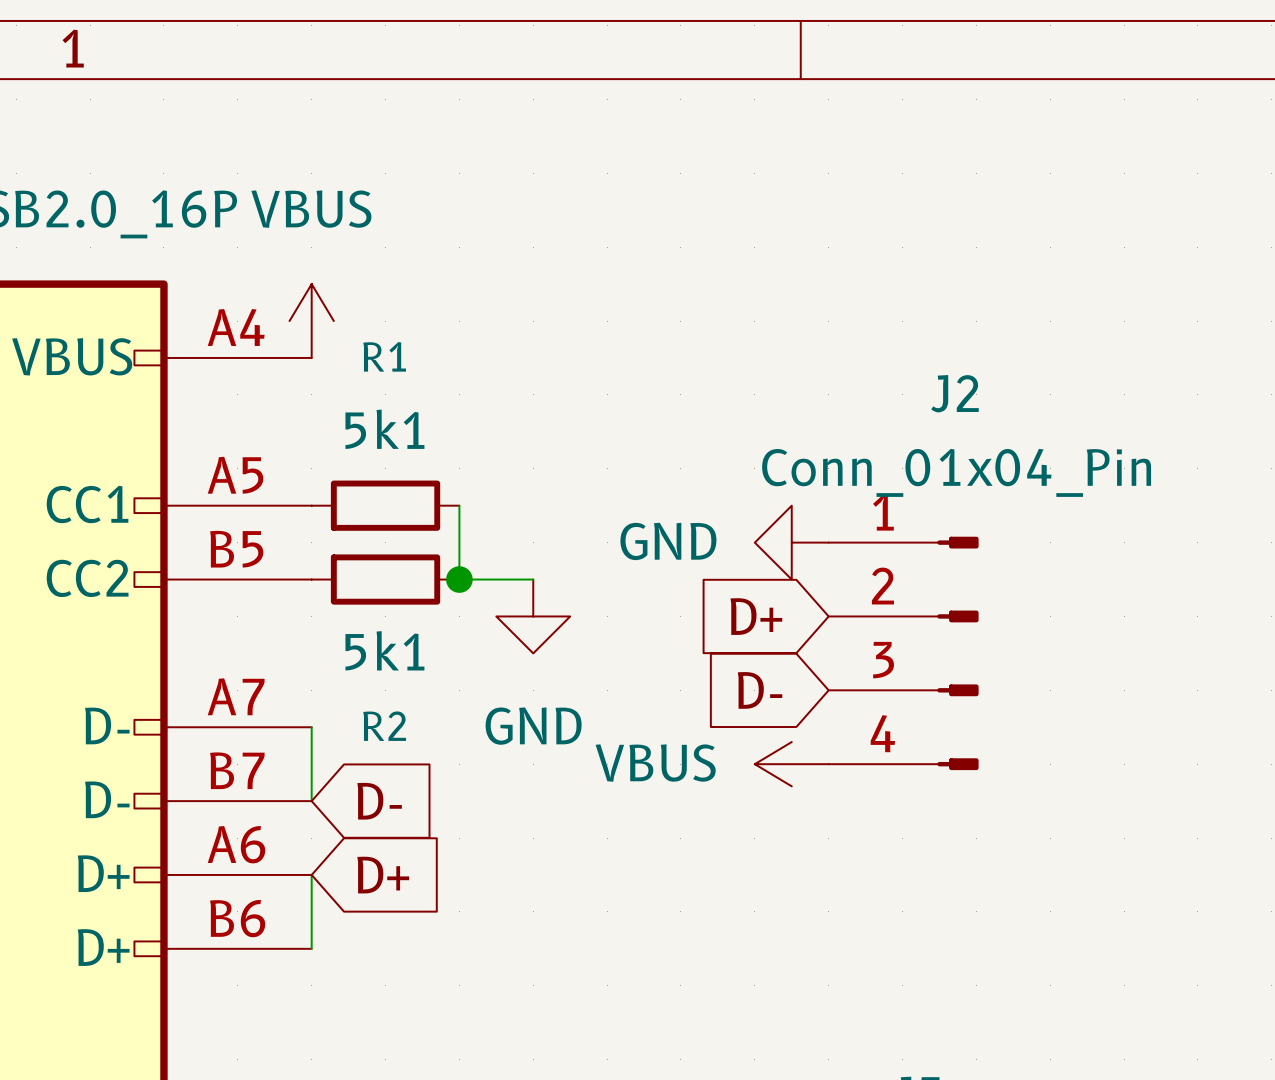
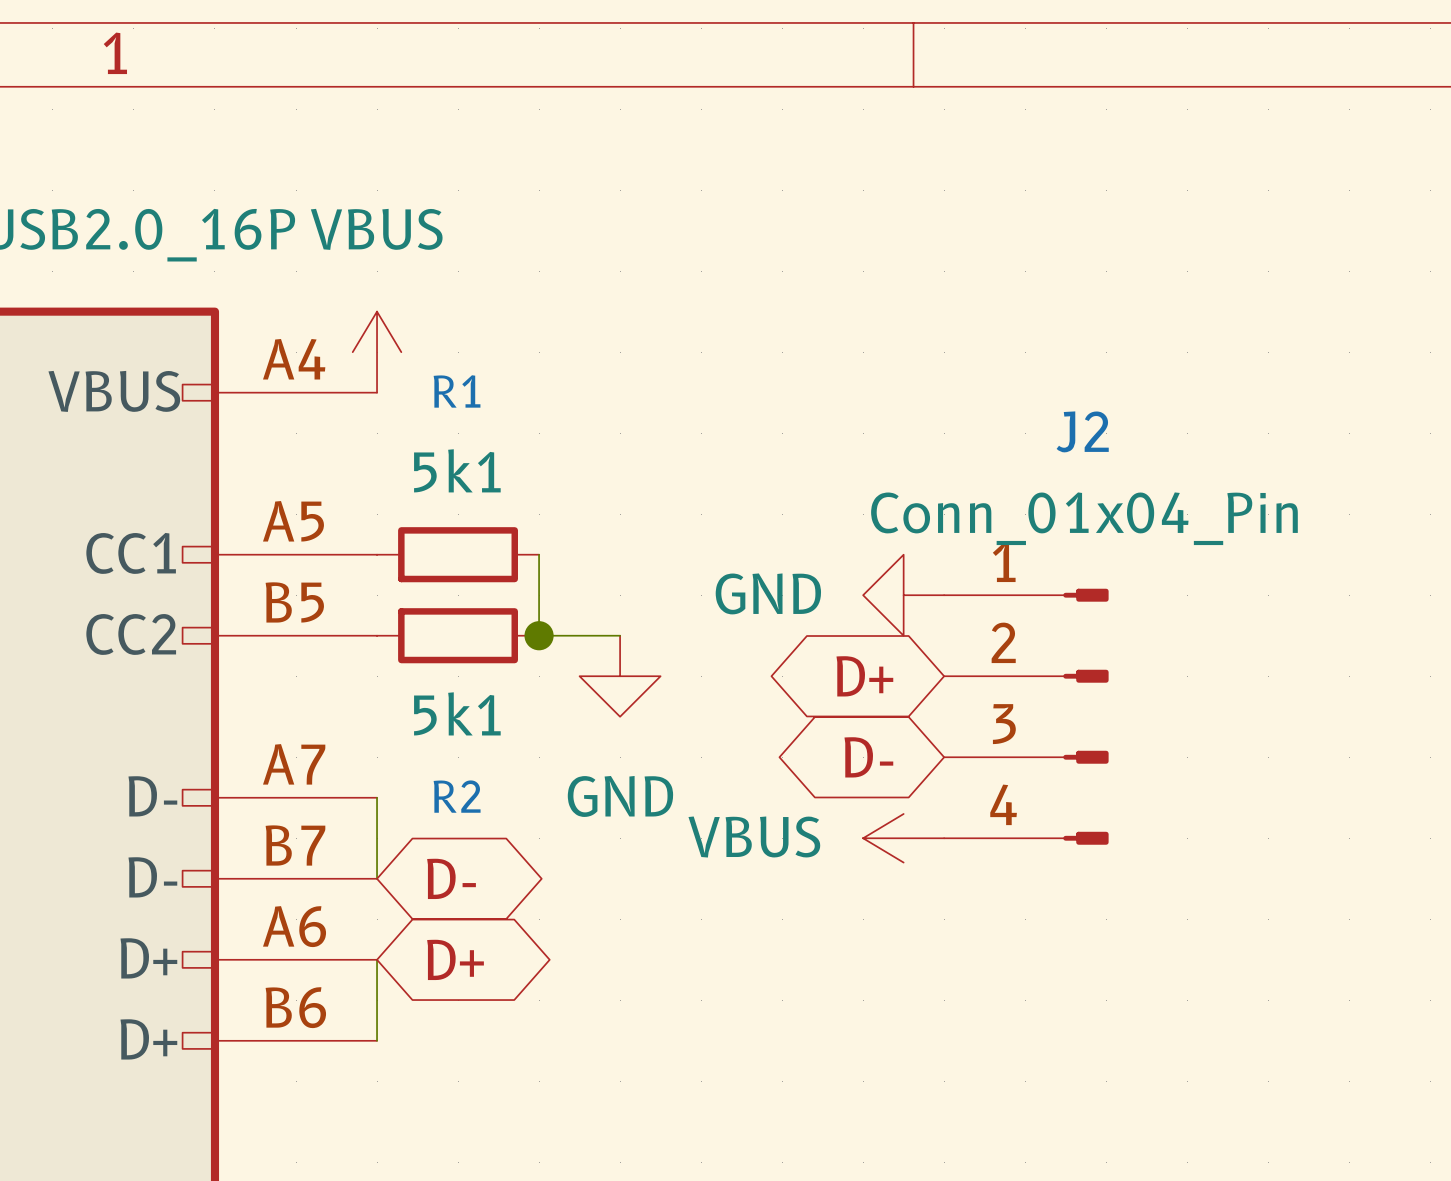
global label shape: input (756, 616) -> bidirectional (864, 676)
global label shape: input (760, 690) -> bidirectional (868, 757)
global label shape: input (379, 801) -> bidirectional (451, 878)
global label shape: input (383, 875) -> bidirectional (455, 959)

